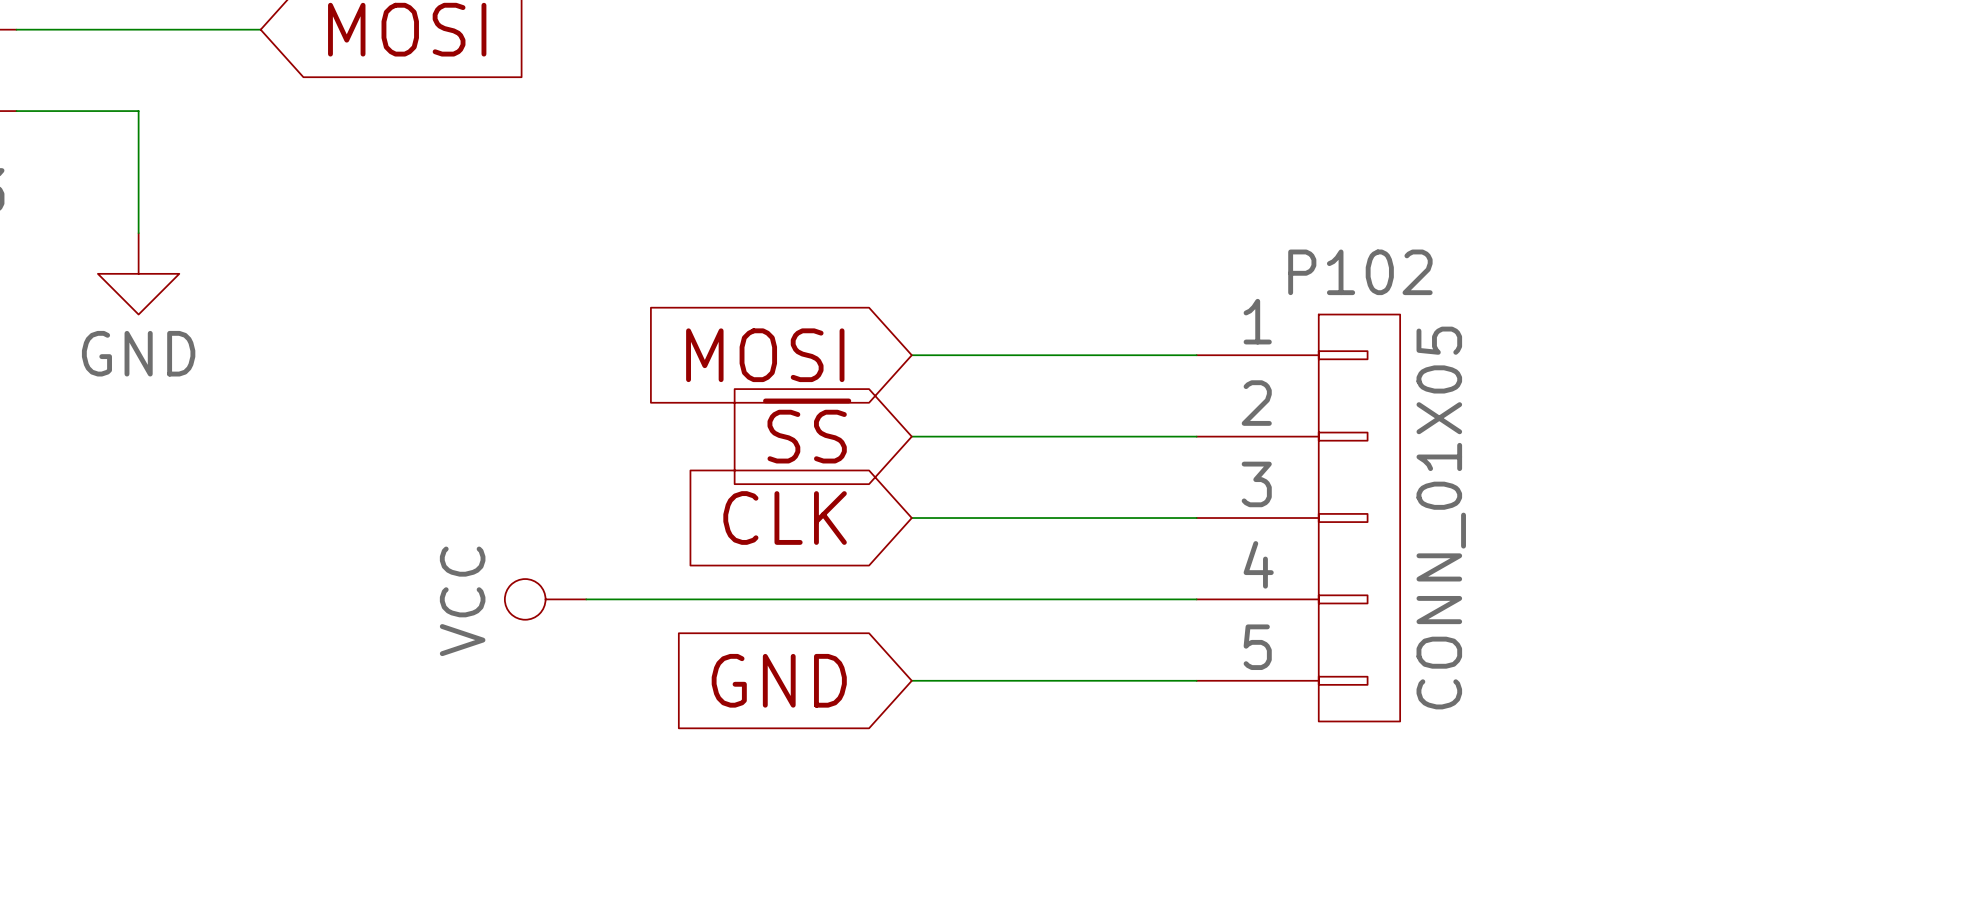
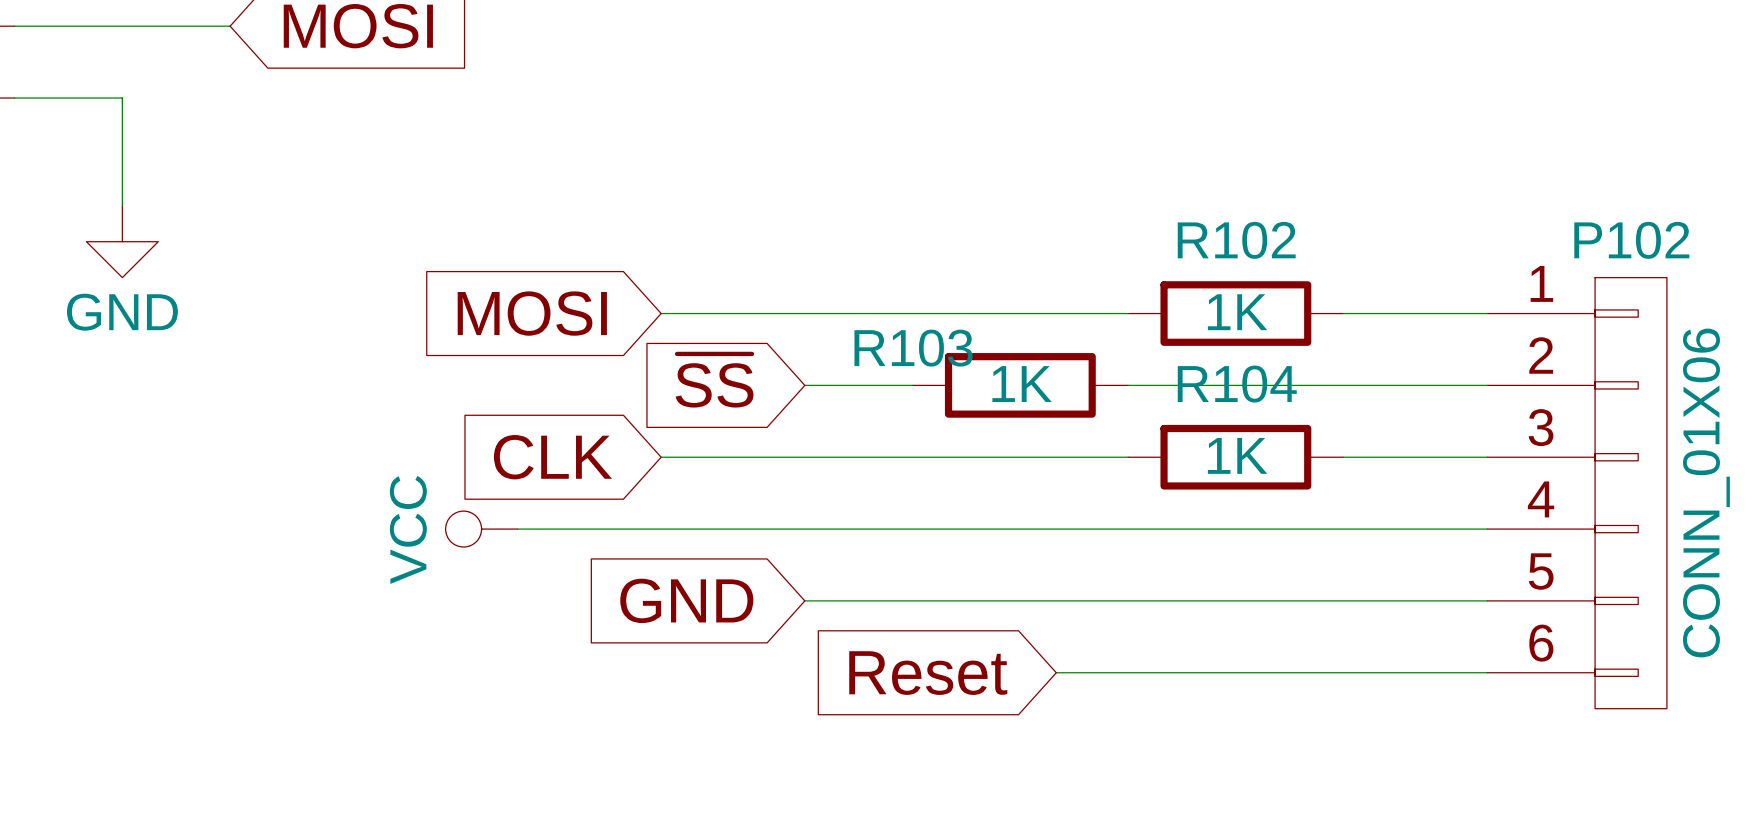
P102 symbol: [1196, 314, 1401, 722] -> [1487, 277, 1667, 709]
global label position: MOSI (765, 355) -> MOSI (532, 313)
R102: none -> 1K (1235, 313)
wire: none -> (1343, 313) (1487, 313)
wire: (1033, 436) (1196, 436) -> (661, 313) (804, 313)
R103: none -> 1K (1020, 385)
wire: none -> (1128, 385) (1487, 385)
wire: none -> (661, 457) (804, 457)
global label position: CLK (785, 518) -> CLK (552, 457)
R104: none -> 1K (1235, 457)
P102 value: CONN_01X05 (1441, 518) -> CONN_01X06 (1706, 492)
wire: none -> (1343, 457) (1487, 457)
wire: none -> (1056, 529) (1487, 529)
wire: none -> (1056, 600) (1487, 600)
global label: none -> Reset (928, 673)
wire: none -> (1056, 672) (1487, 672)

